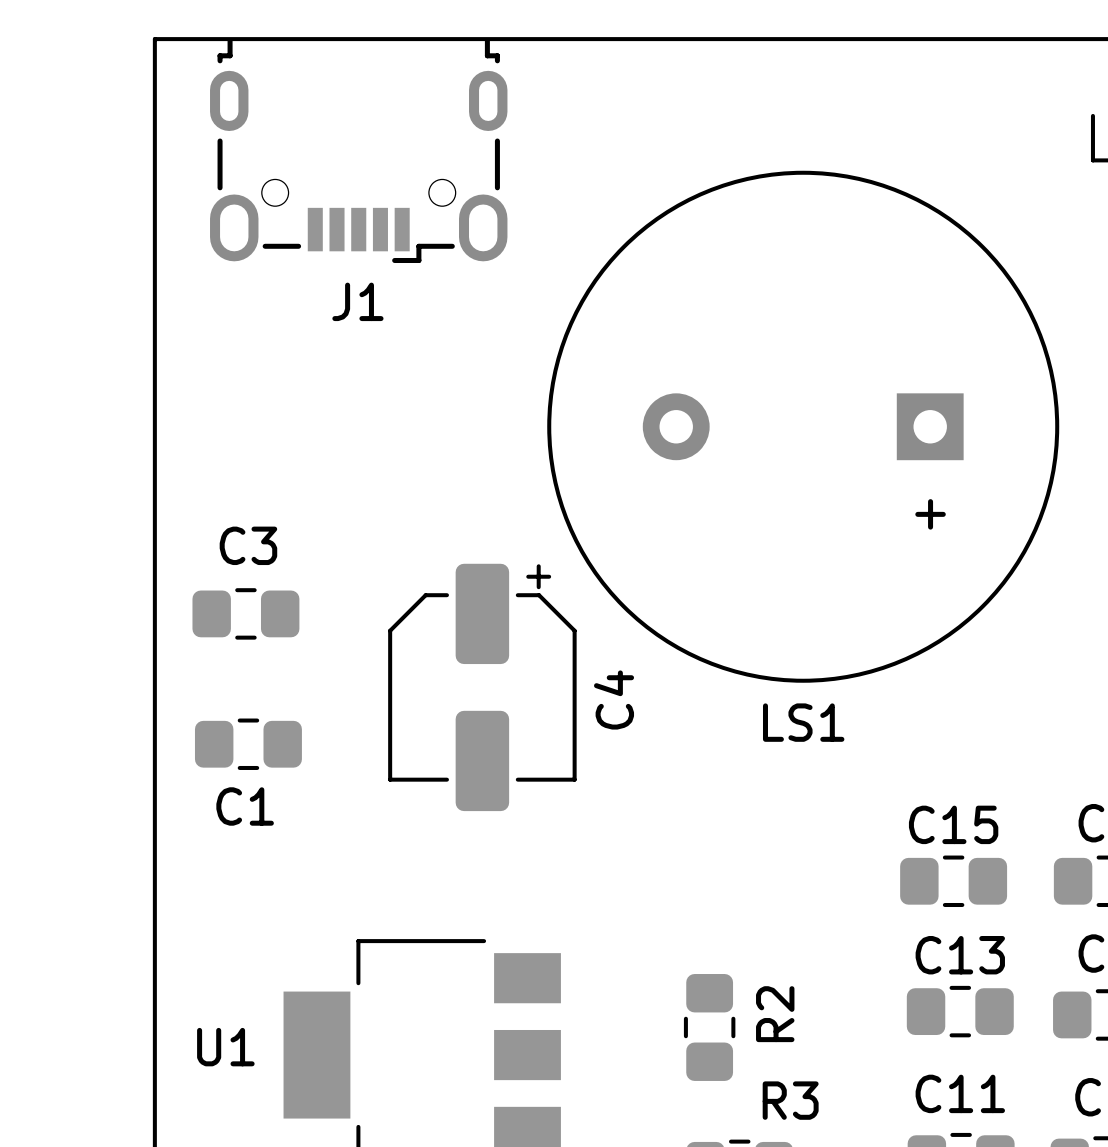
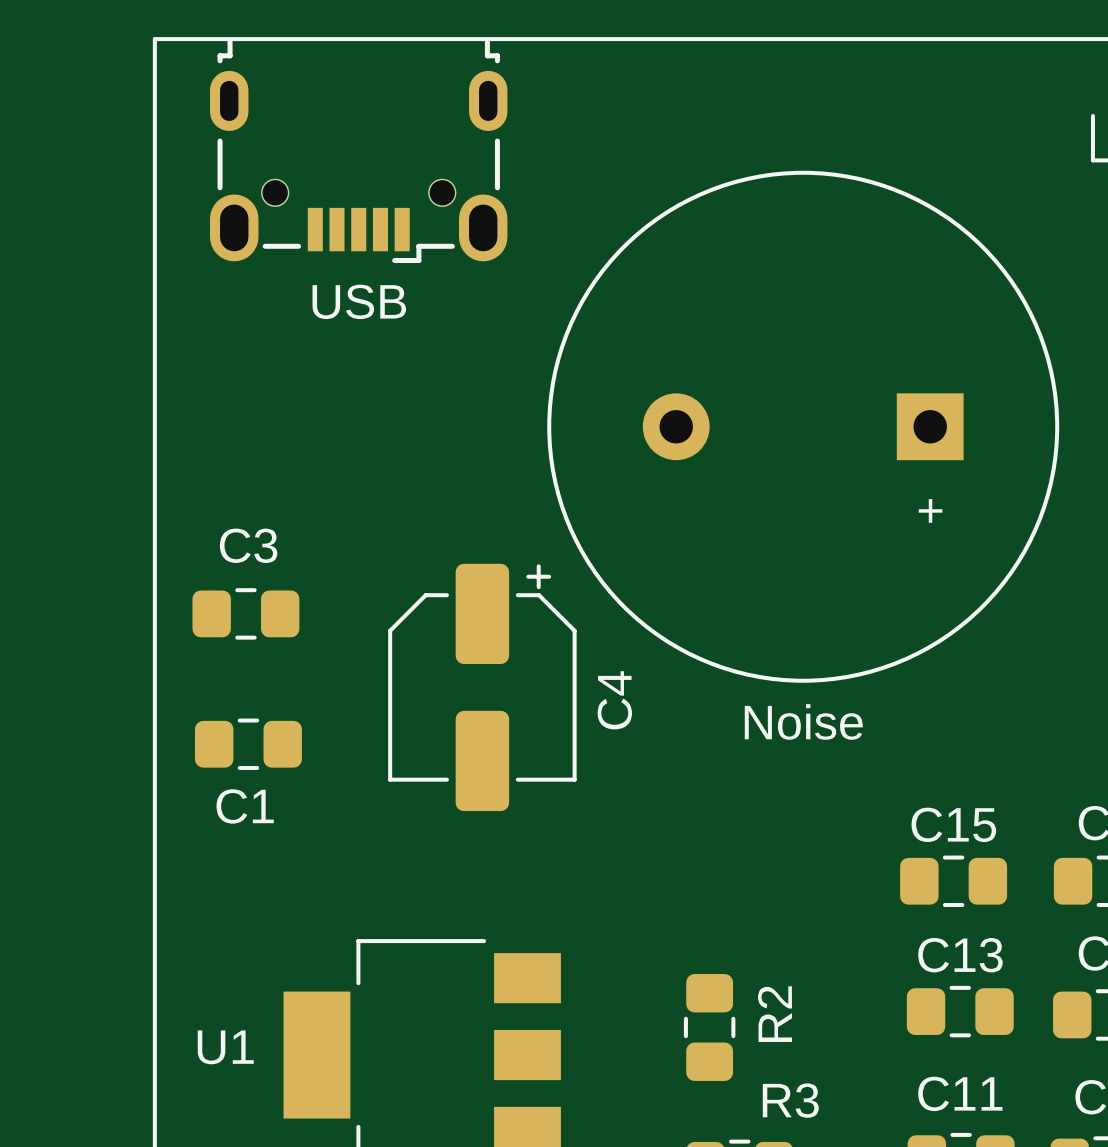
J1 name: J1 (357, 301) -> USB (359, 301)
LS1 name: LS1 (803, 722) -> Noise (803, 721)

